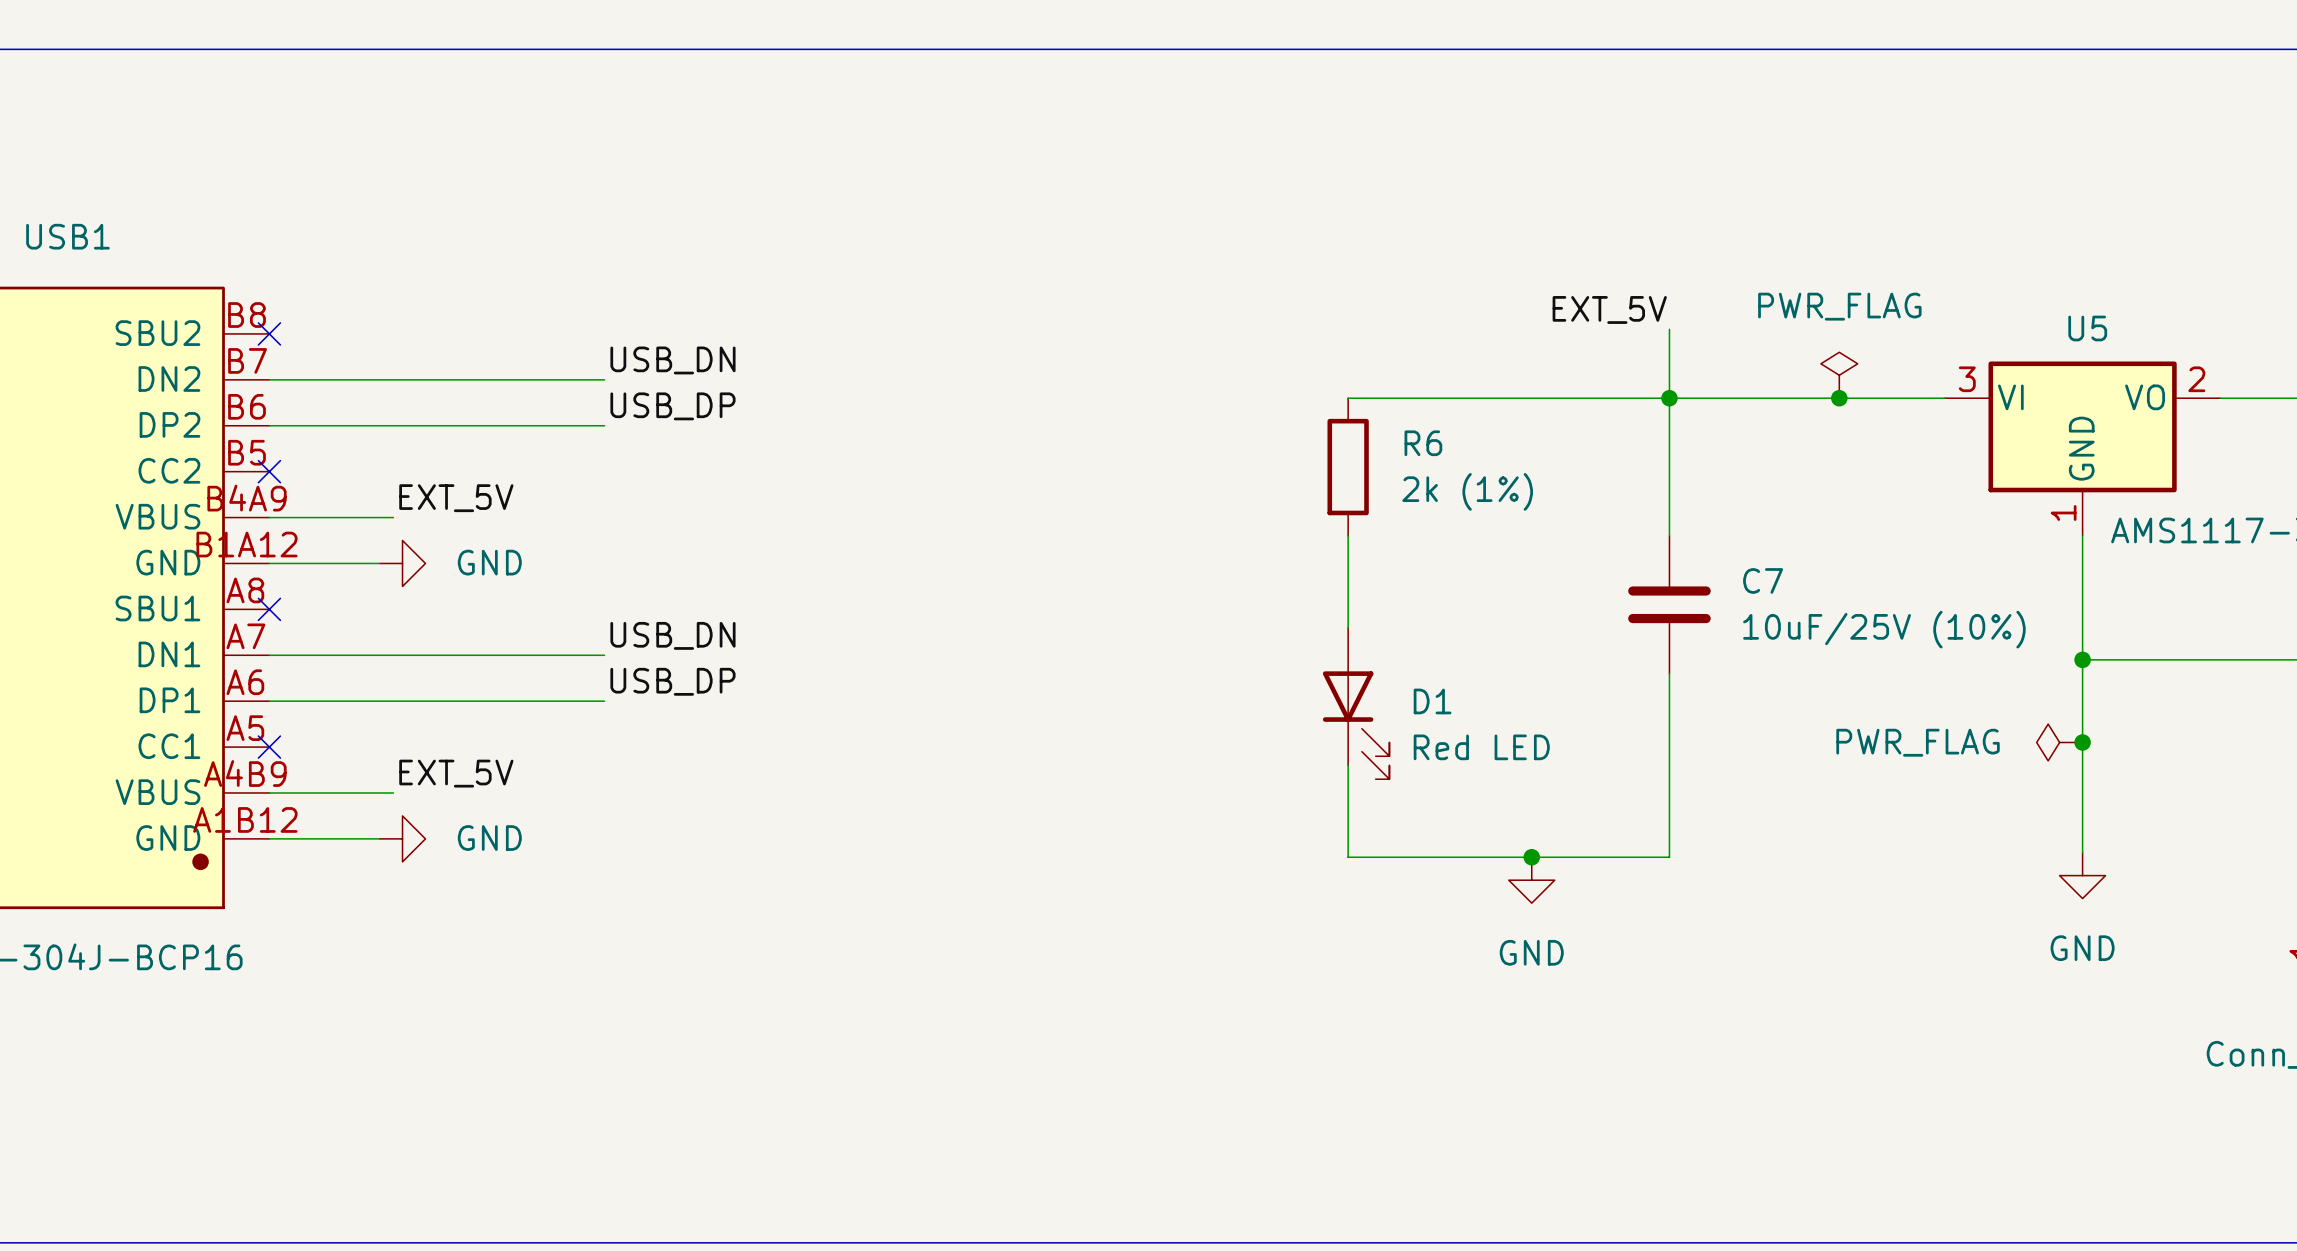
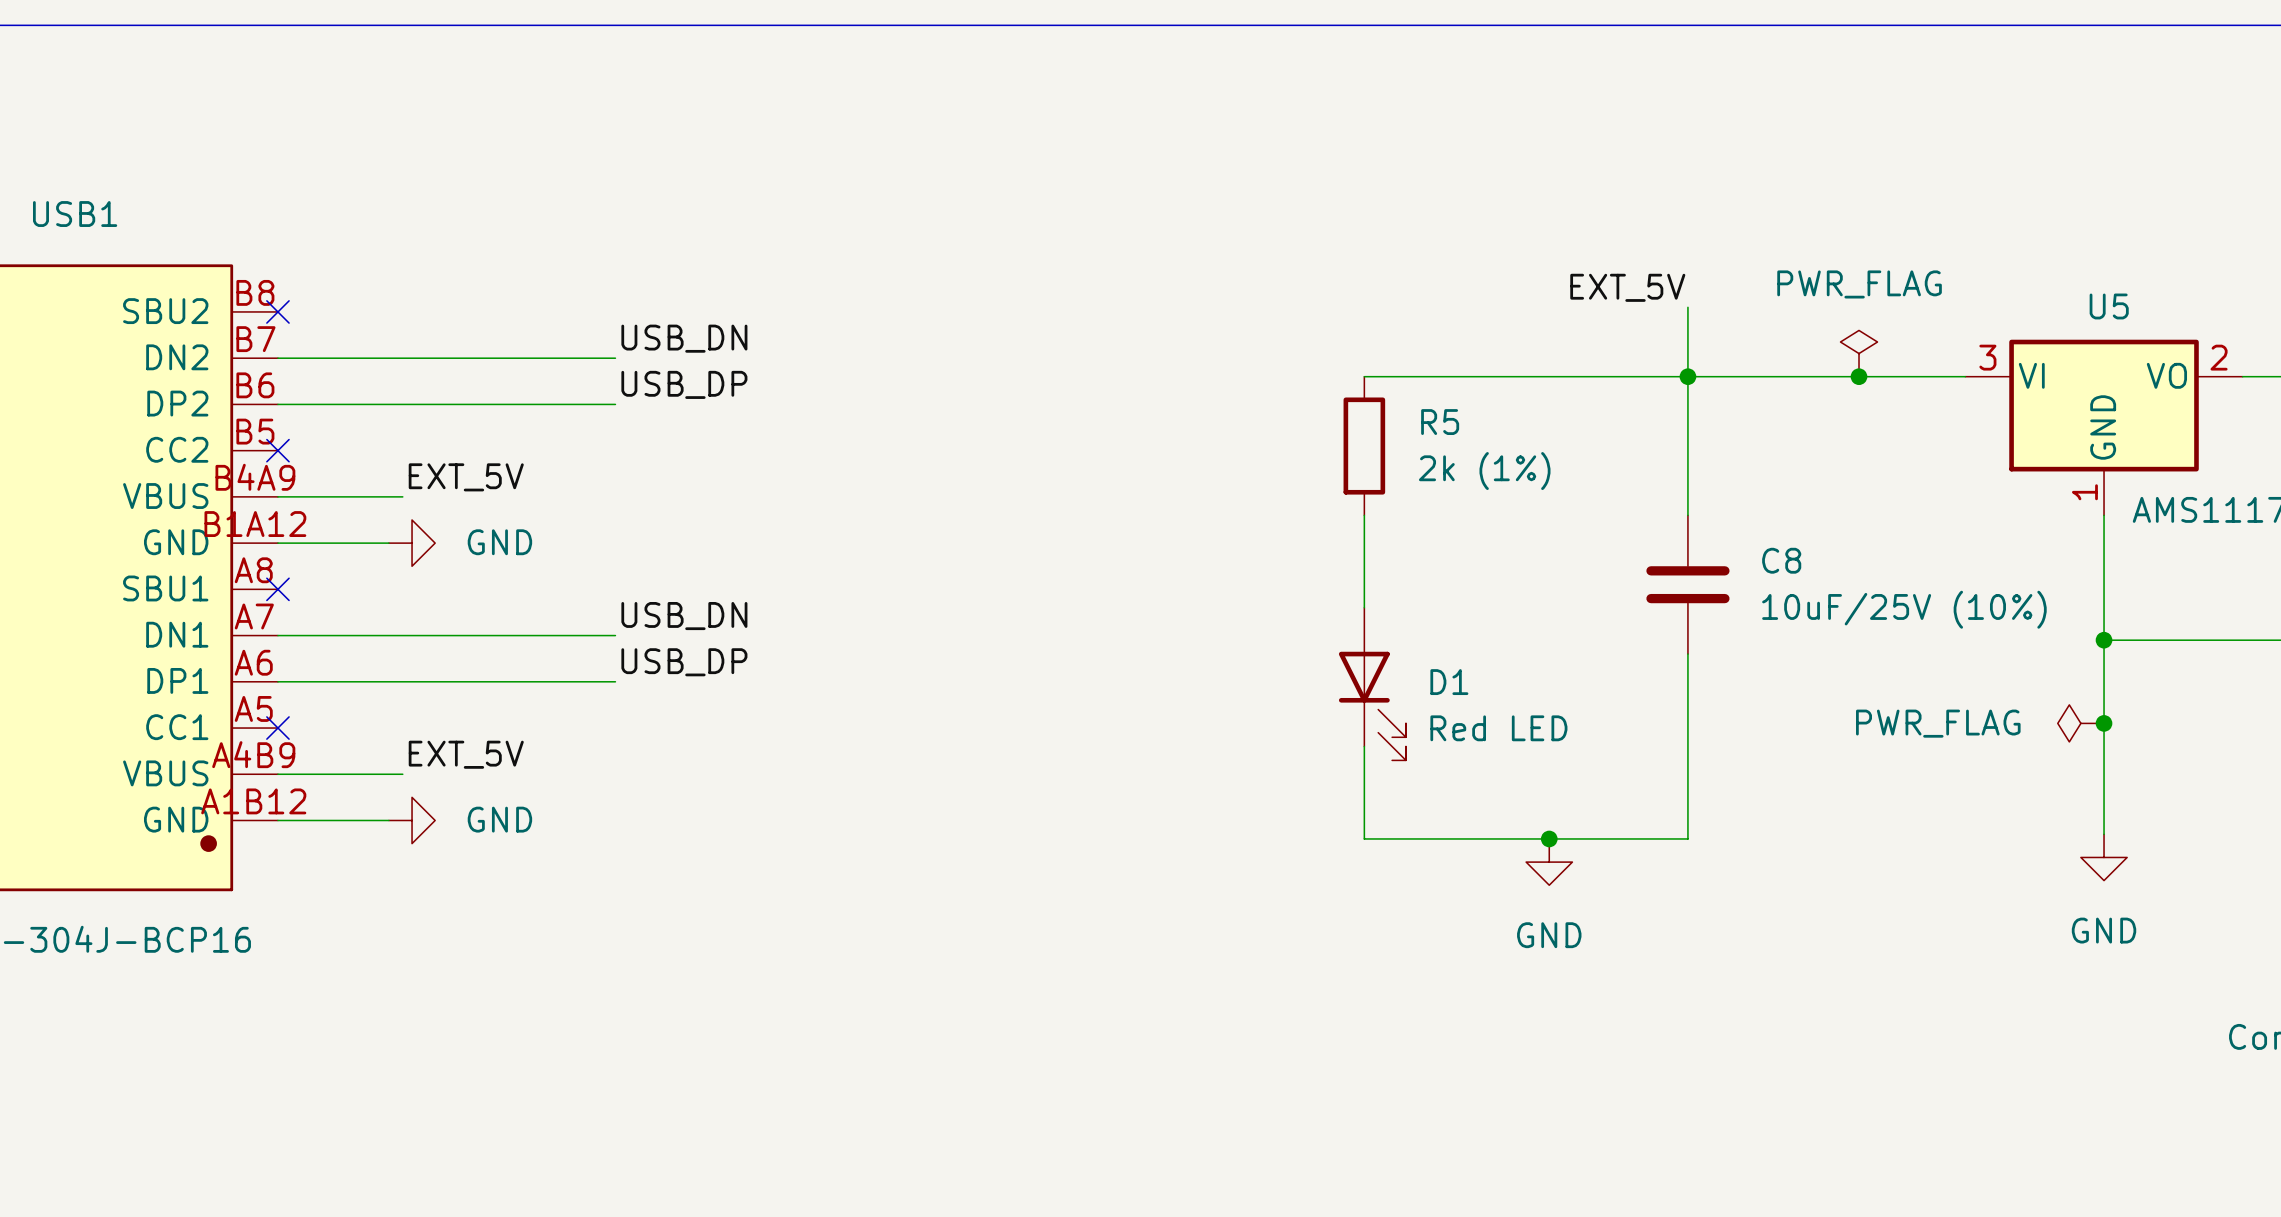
R6 name: R6 (1423, 443) -> R5 (1440, 422)
C7 name: C7 (1763, 580) -> C8 (1781, 560)

